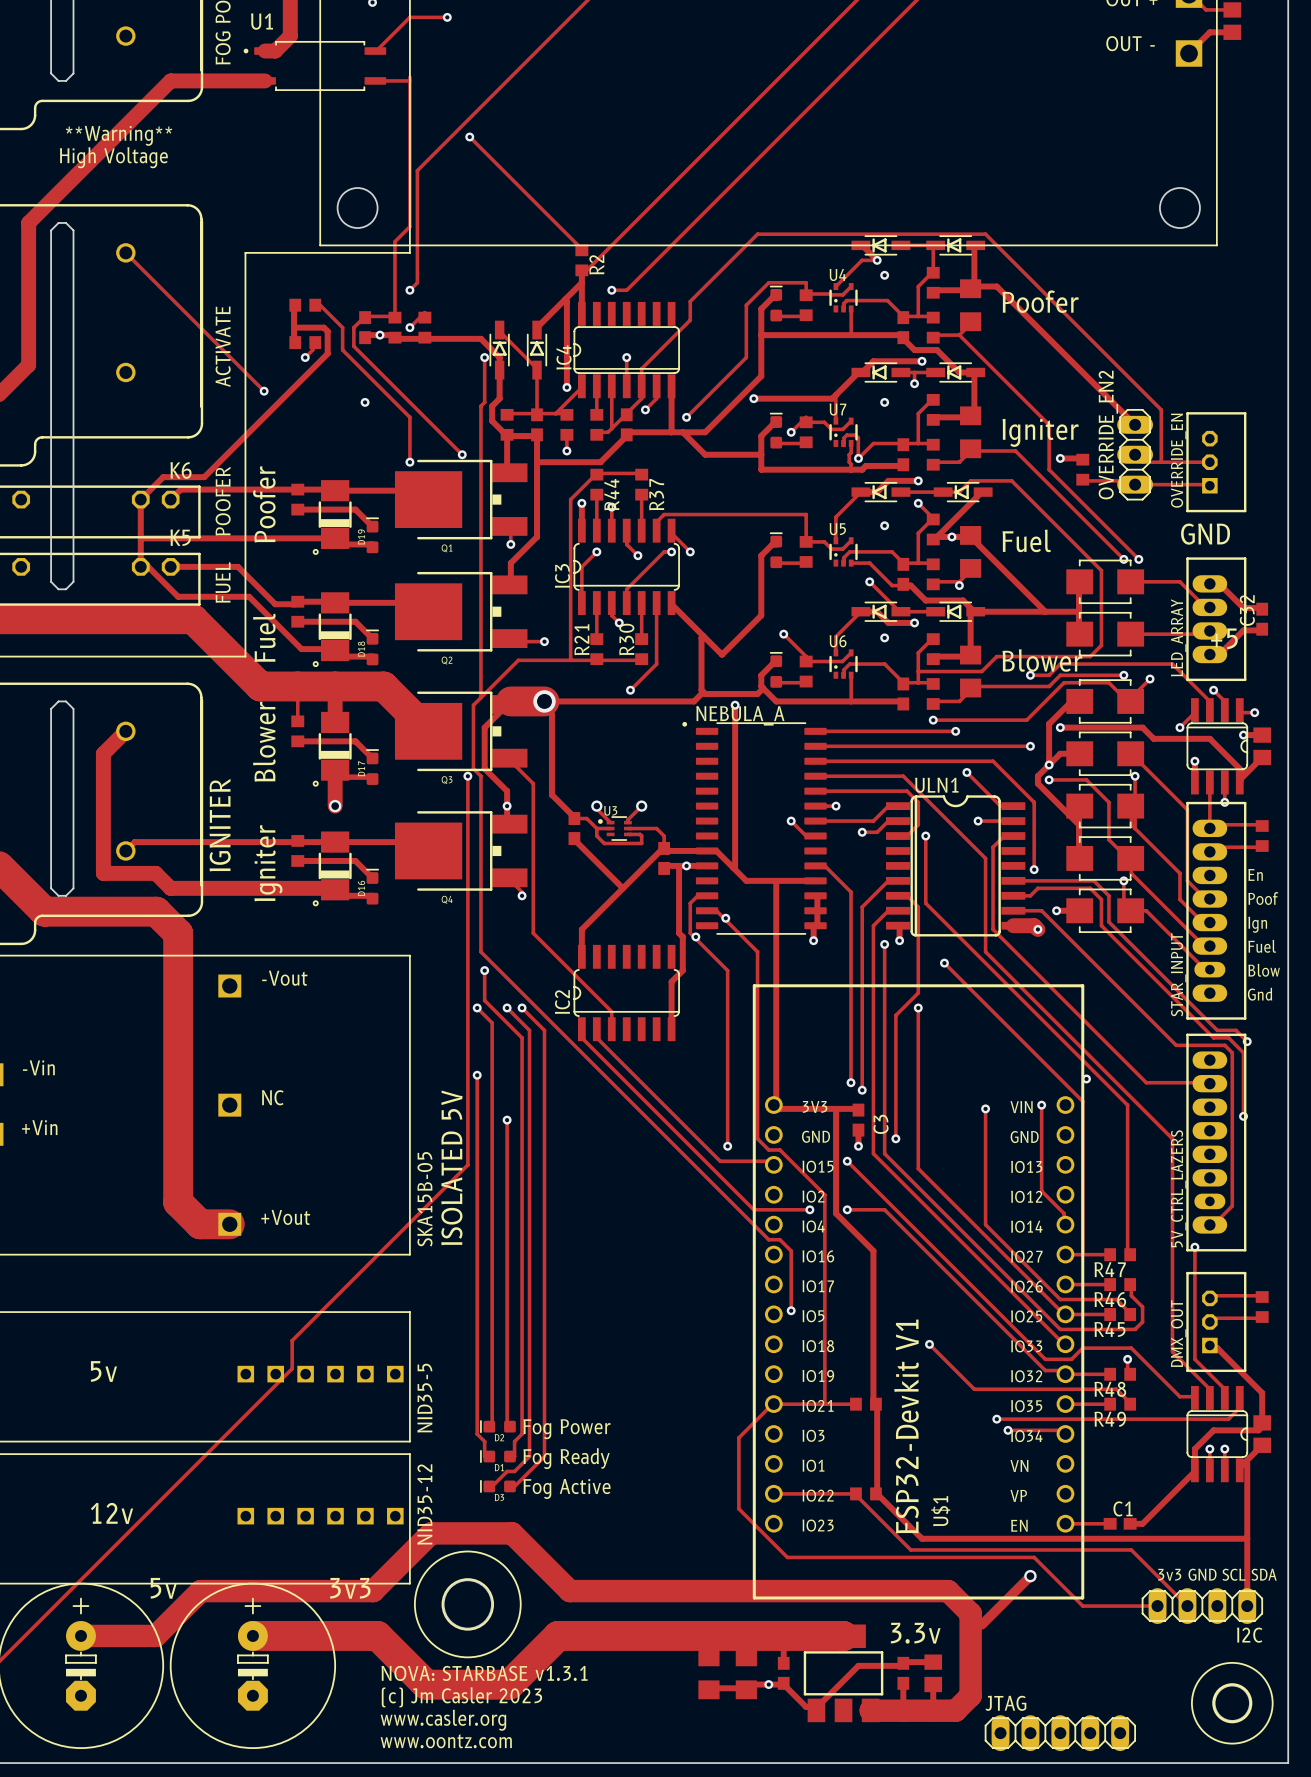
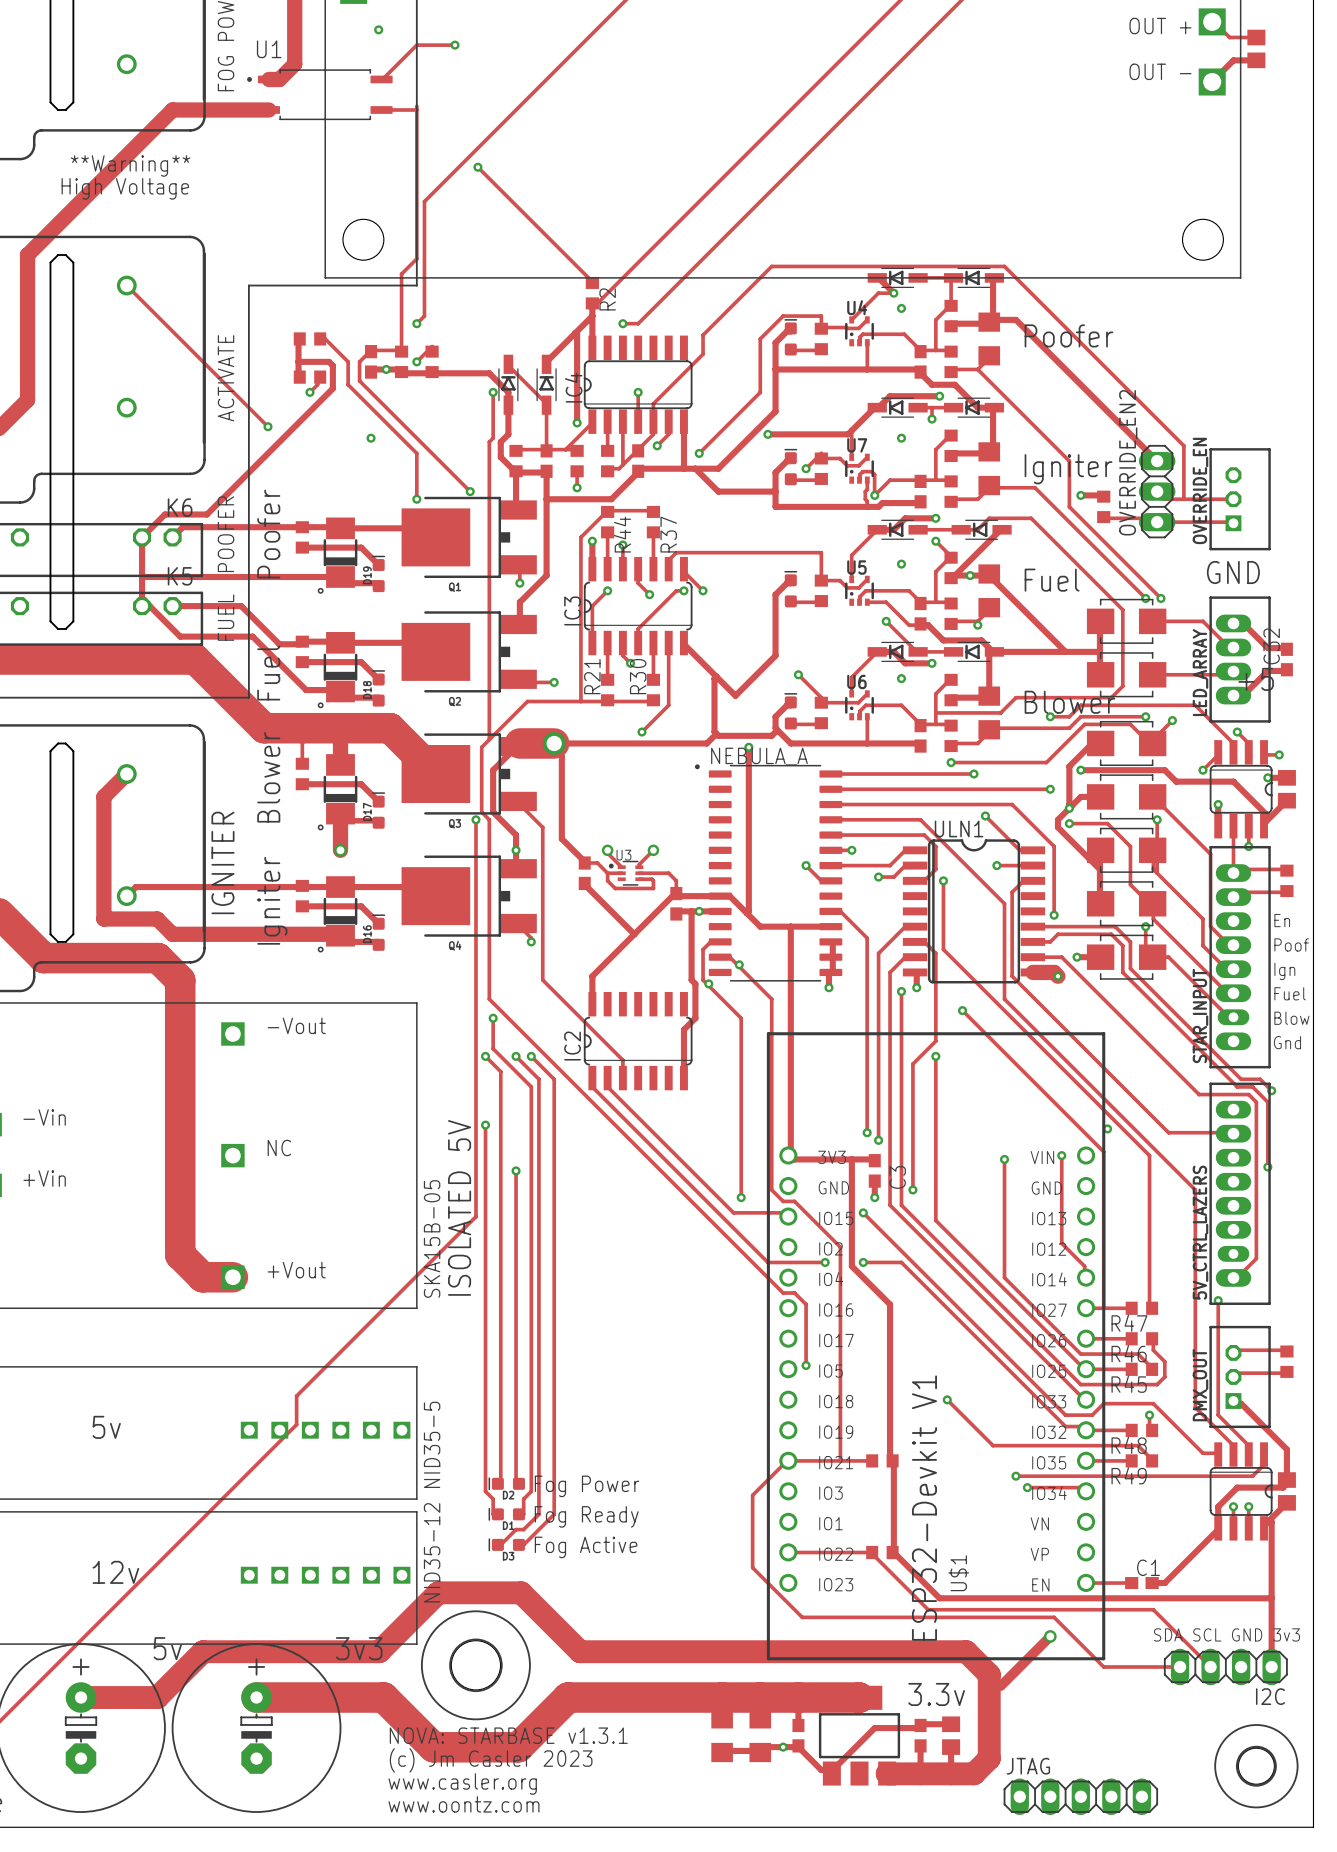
text: 3v3 GND SCL SDA (1217, 1574) -> SDA SCL GND 3v3 (1226, 1634)

